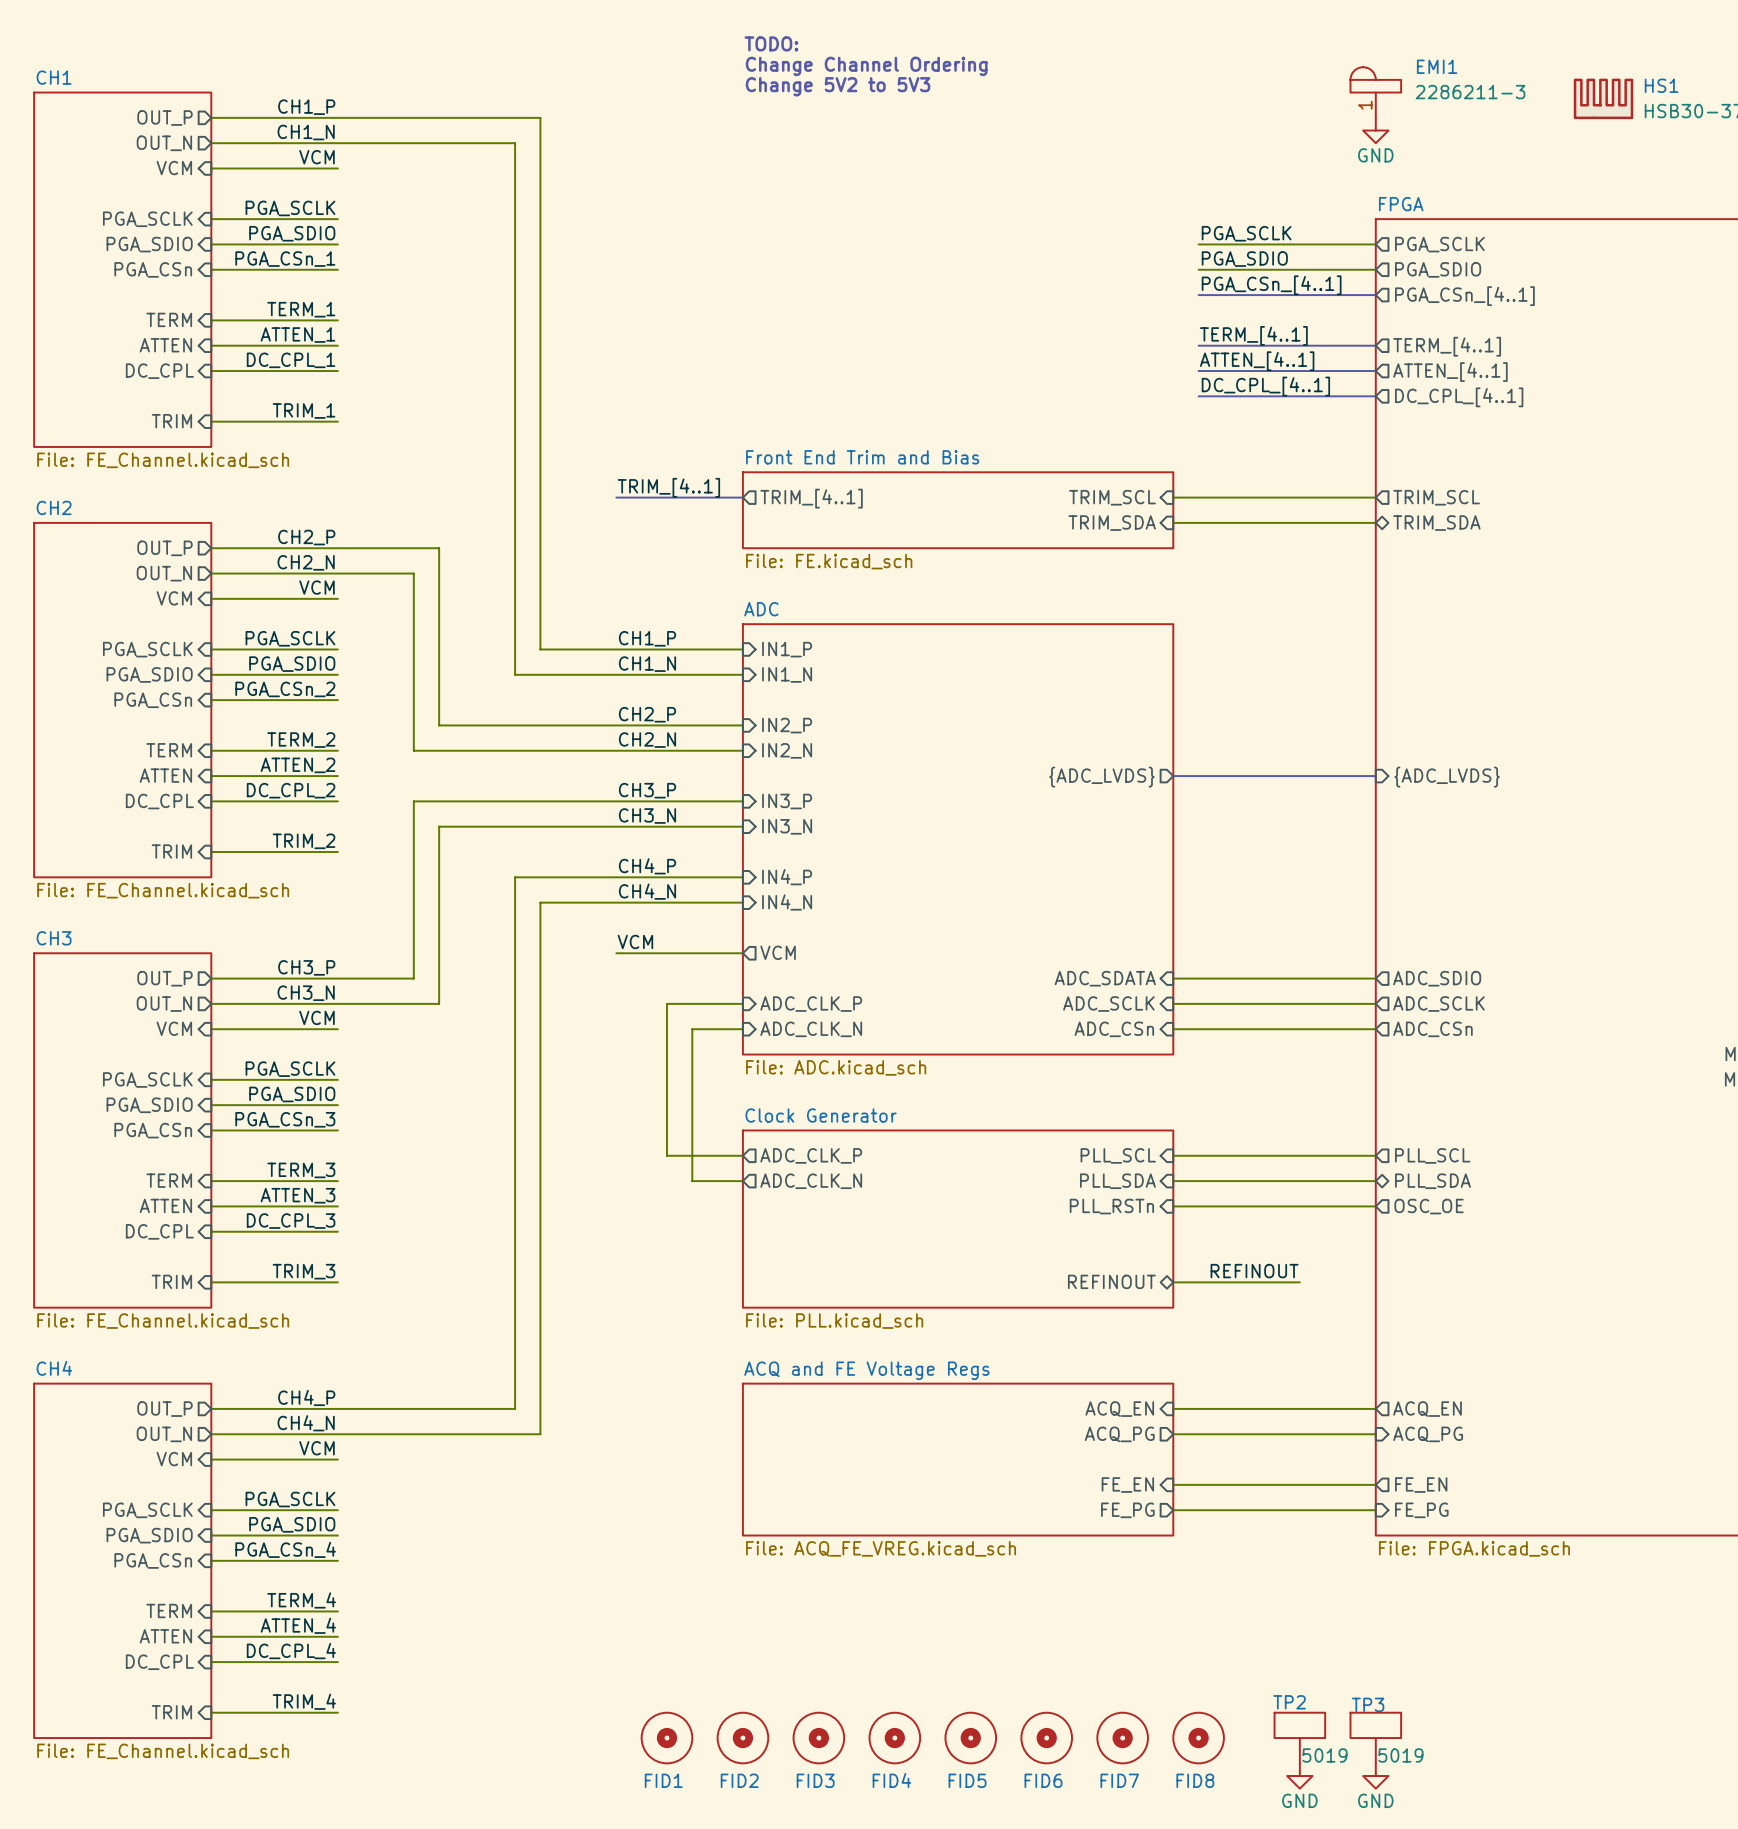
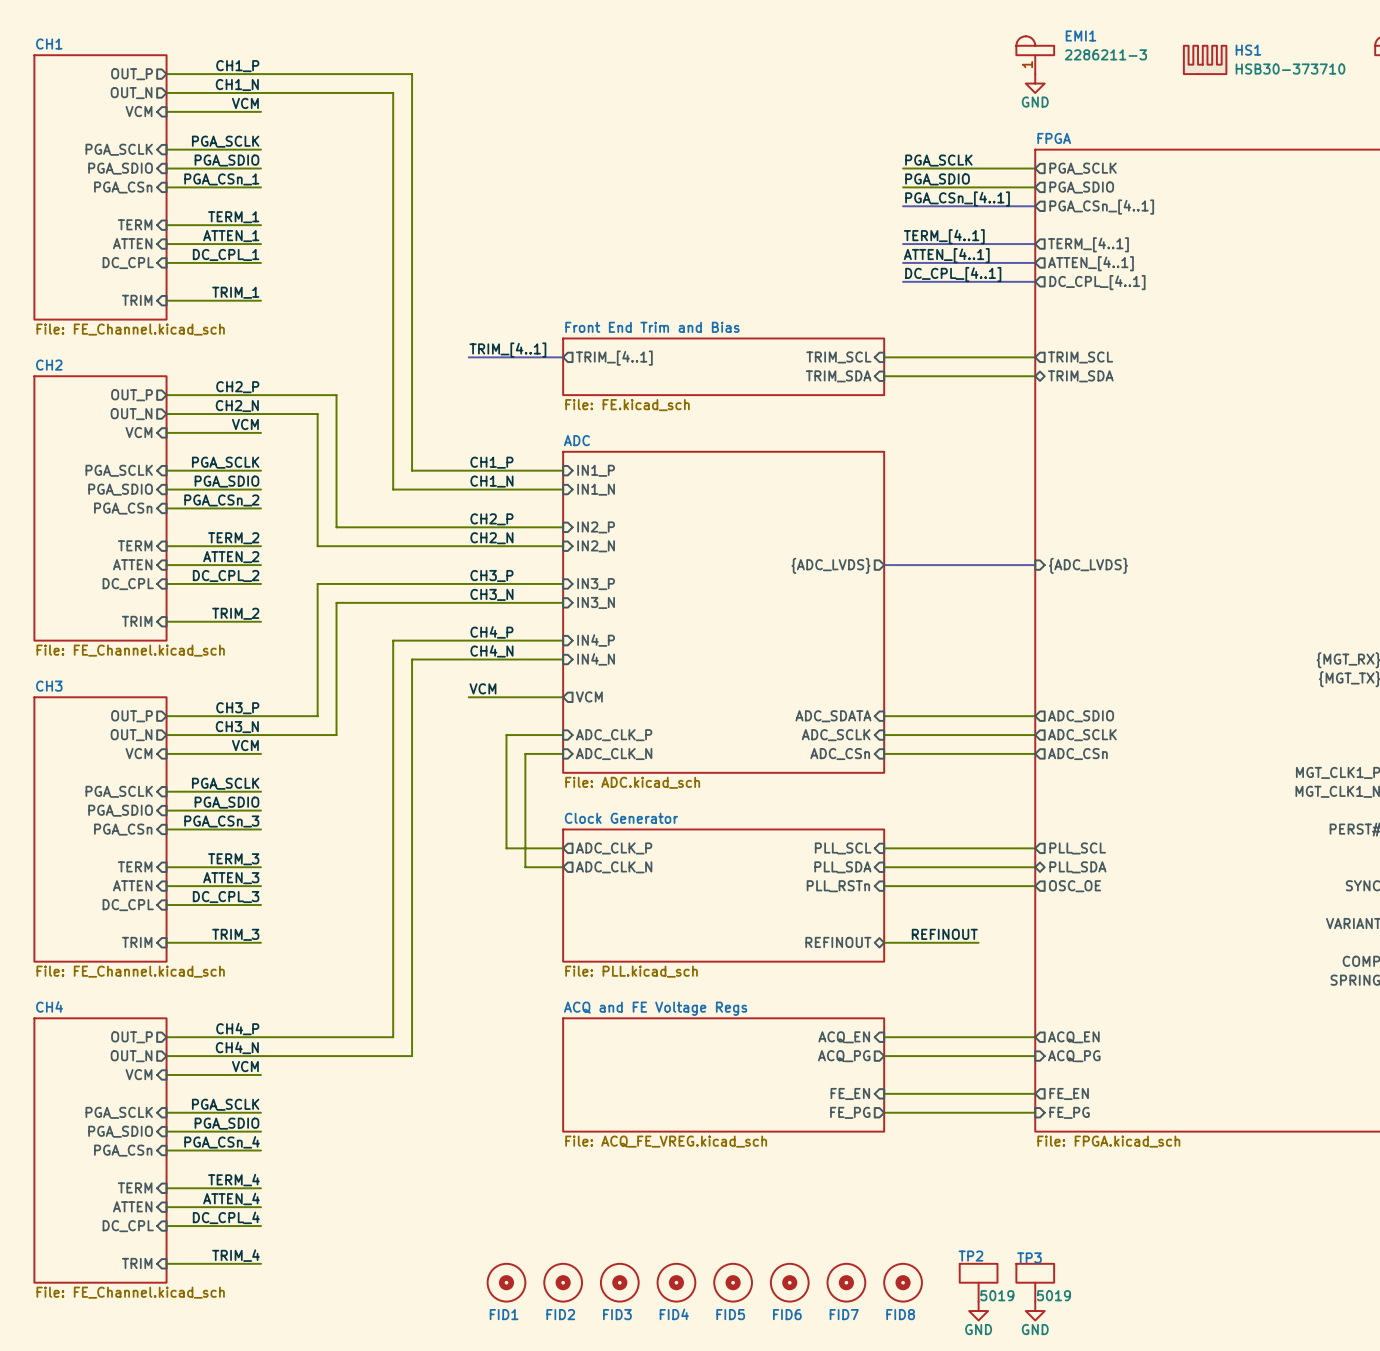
text: TODO: (771, 43) -> none
text: Change Channel Ordering (866, 66) -> none
text: Change 5V2 to 5V3 (838, 86) -> none

